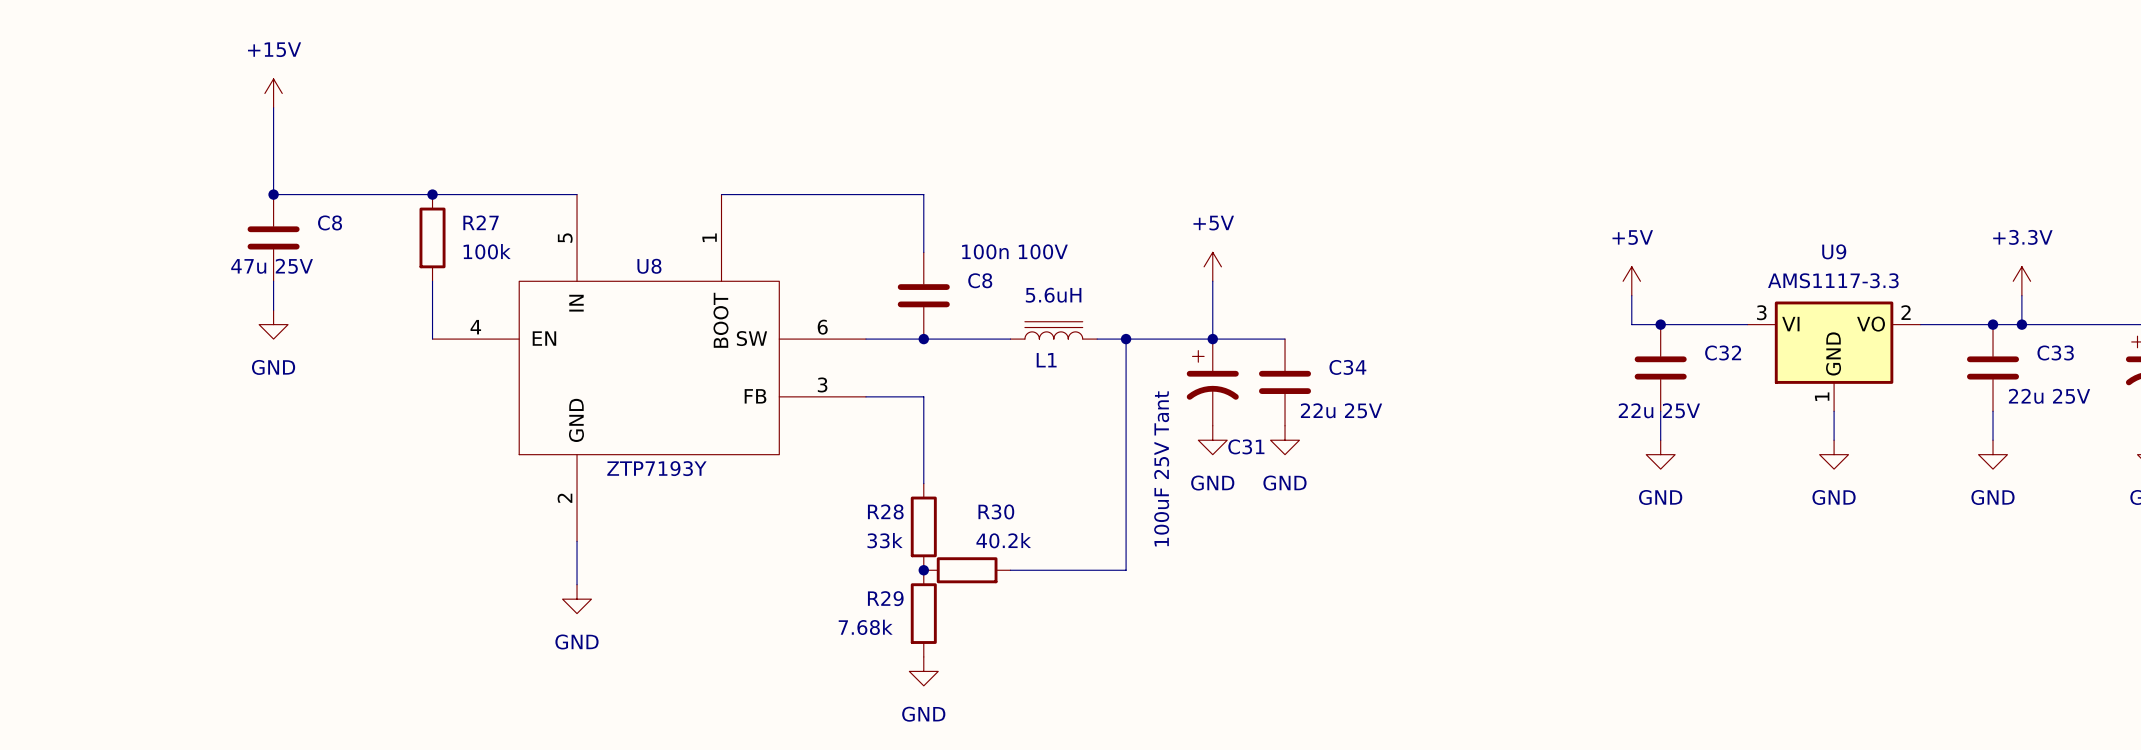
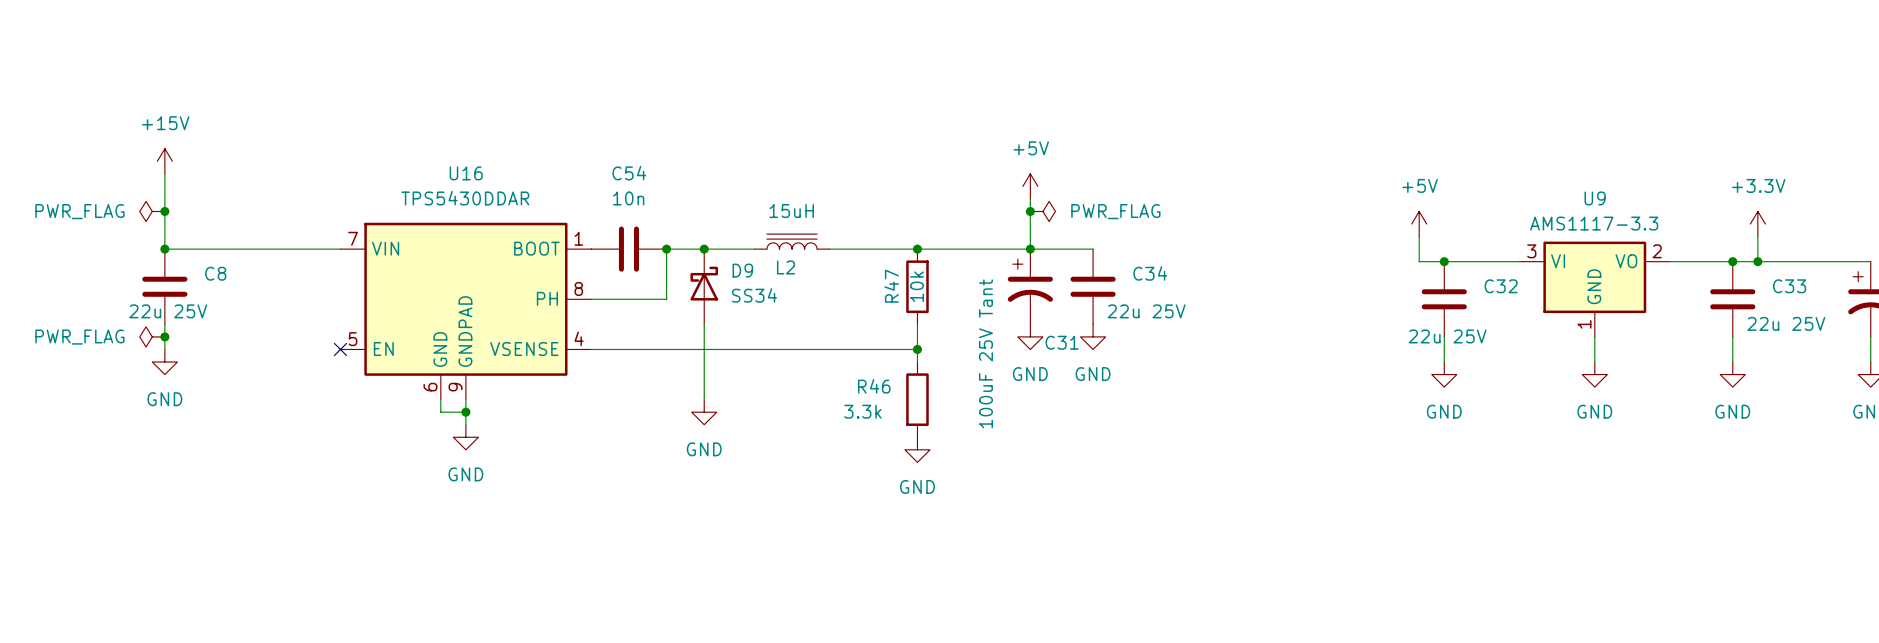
power symbol position: +15V (273, 93) -> +15V (164, 161)
wire: (273, 107) (273, 194) (577, 194) -> none
junction: (273, 194) -> none
junction: (432, 194) -> none
wire: (721, 194) (923, 194) (923, 252) -> none
wire: none -> (164, 173) (164, 249) (340, 249)
C8: 47u 25V (273, 237) -> none
R27: 100k (432, 237) -> none
power symbol: none -> PWR_FLAG (152, 211)
junction: none -> (164, 211)
junction: none -> (1030, 211)
power symbol: none -> PWR_FLAG (1042, 211)
power symbol position: +5V (1212, 266) -> +5V (1030, 186)
wire: (273, 281) (273, 310) -> (164, 324) (164, 349)
wire: (1212, 281) (1212, 339) -> (1030, 198) (1030, 249)
C8: 100n 100V (923, 295) -> none
L2: none -> 15uH (792, 241)
junction: none -> (164, 249)
C54: none -> 10n (628, 249)
junction: none -> (666, 249)
junction: none -> (704, 249)
wire: none -> (754, 249) (666, 249) (666, 299) (591, 299)
wire: none -> (829, 249) (1093, 249)
junction: none -> (917, 249)
junction: none -> (1030, 249)
power symbol position: GND (273, 324) -> GND (164, 362)
L1: 5.6uH (1053, 330) -> none
wire: (865, 339) (1010, 339) -> none
junction: (923, 339) -> none
wire: (1097, 339) (1285, 339) -> none
wire: (1126, 339) (1126, 570) (1010, 570) -> none
junction: (1126, 339) -> none
junction: (1212, 339) -> none
C8: none -> 22u 25V (164, 286)
D9: none -> SS34 (704, 286)
R47: none -> 10k (917, 286)
U8: ZTP7193Y (649, 367) -> none
U16: none -> TPS5430DDAR (465, 311)
C31 position: (1212, 382) -> (1030, 286)
C34 position: (1285, 382) -> (1093, 286)
wire: none -> (704, 324) (704, 399)
wire: (865, 396) (923, 396) (923, 483) -> none
wire: none -> (917, 324) (917, 362)
power symbol: none -> PWR_FLAG (152, 336)
junction: none -> (164, 336)
power symbol: none -> GND (1030, 336)
power symbol: none -> GND (1093, 336)
no-connect mark: none -> (340, 349)
wire: none -> (591, 349) (917, 349)
junction: none -> (917, 349)
power symbol: GND (1212, 440) -> none
power symbol: GND (1285, 440) -> none
wire: none -> (440, 399) (440, 412) (465, 412)
wire: none -> (465, 399) (465, 424)
R46: none -> 3.3k (917, 399)
junction: none -> (465, 412)
power symbol: none -> GND (704, 412)
R28: 33k (923, 526) -> none
wire: (577, 541) (577, 584) -> none
power symbol: none -> GND (917, 449)
junction: (923, 570) -> none
R30: 40.2k (967, 570) -> none
power symbol position: GND (577, 599) -> GND (465, 437)
R29: 7.68k (923, 613) -> none
power symbol: GND (923, 671) -> none

